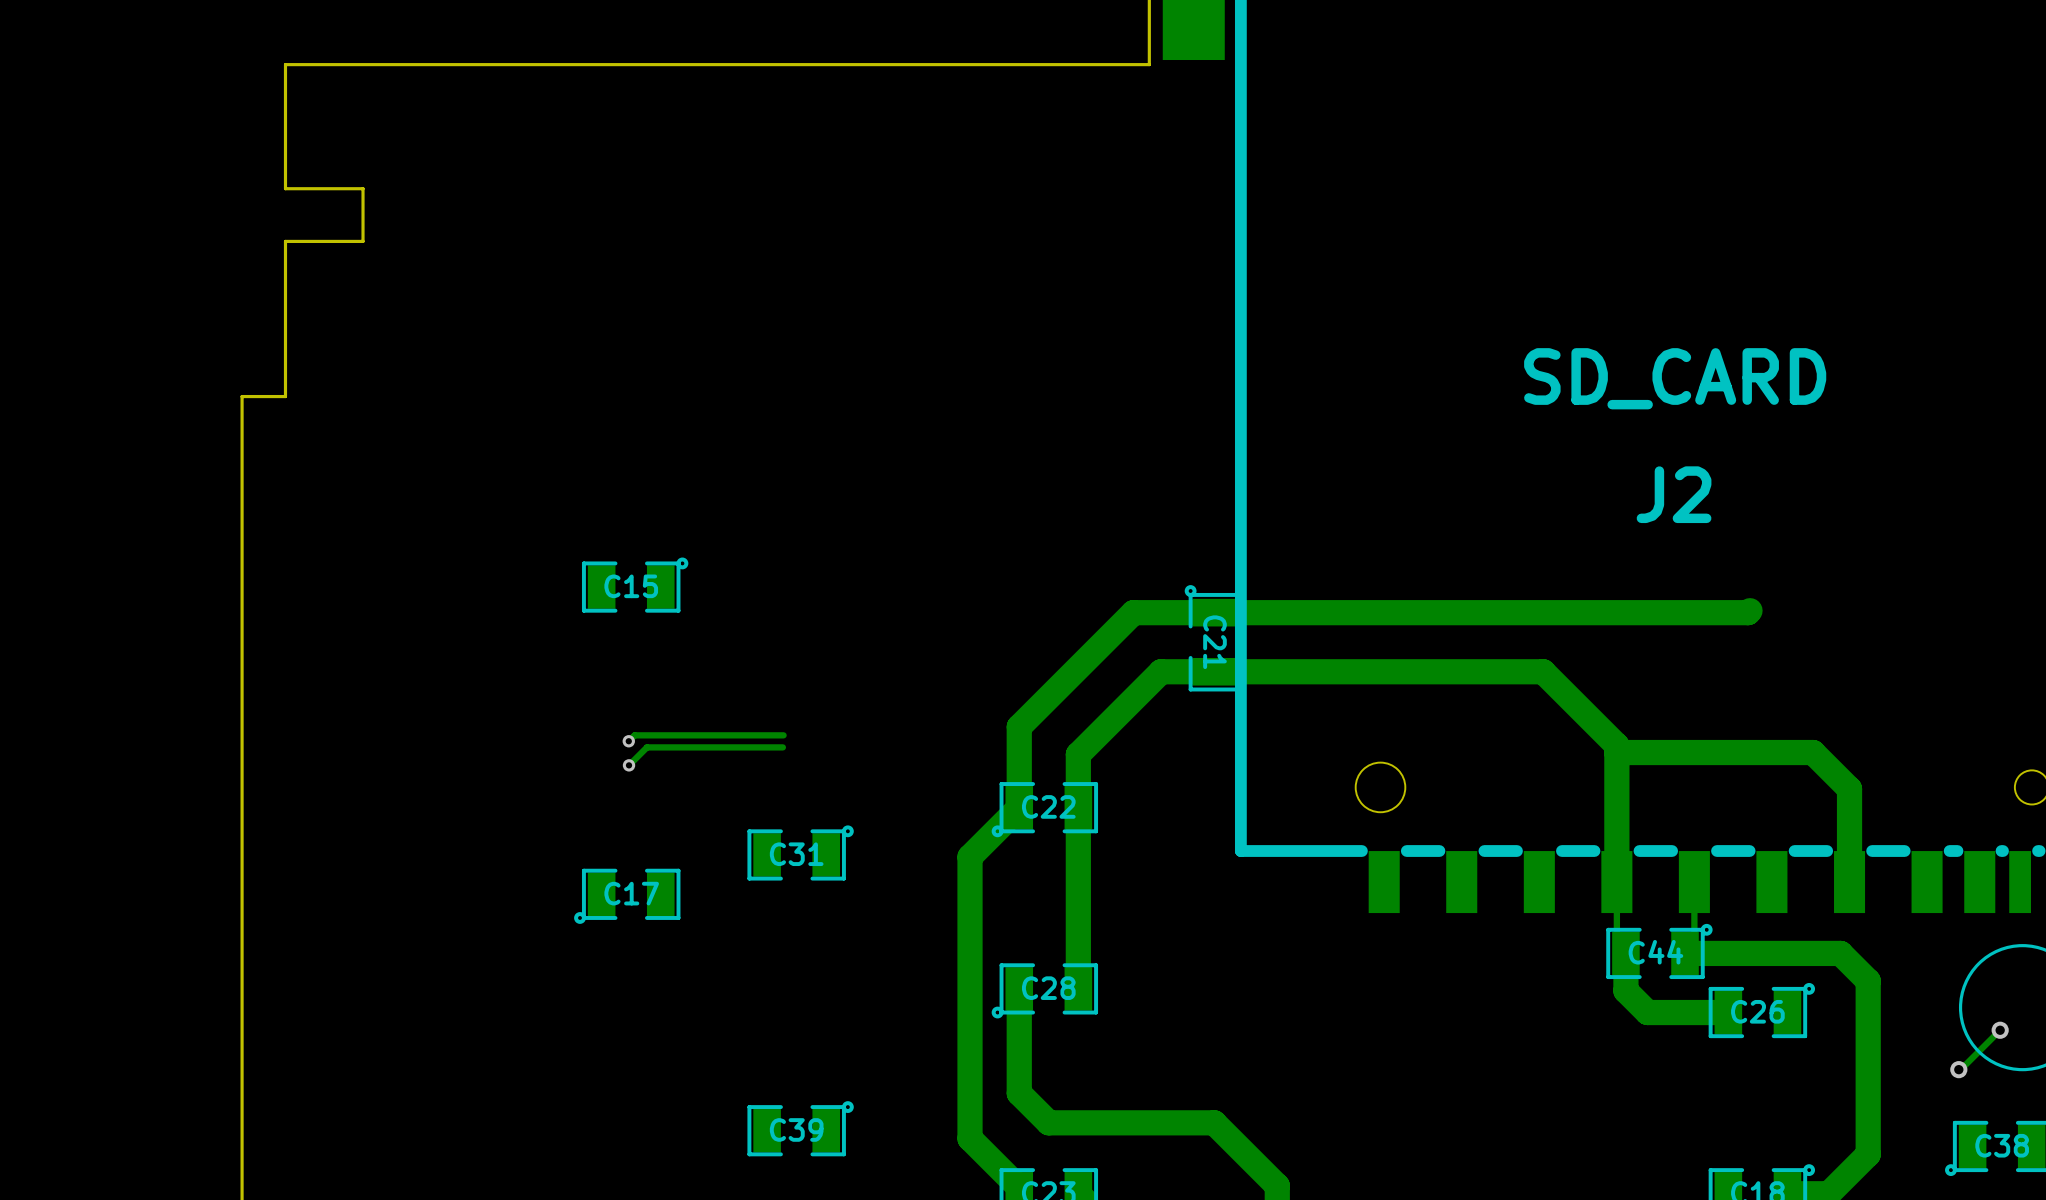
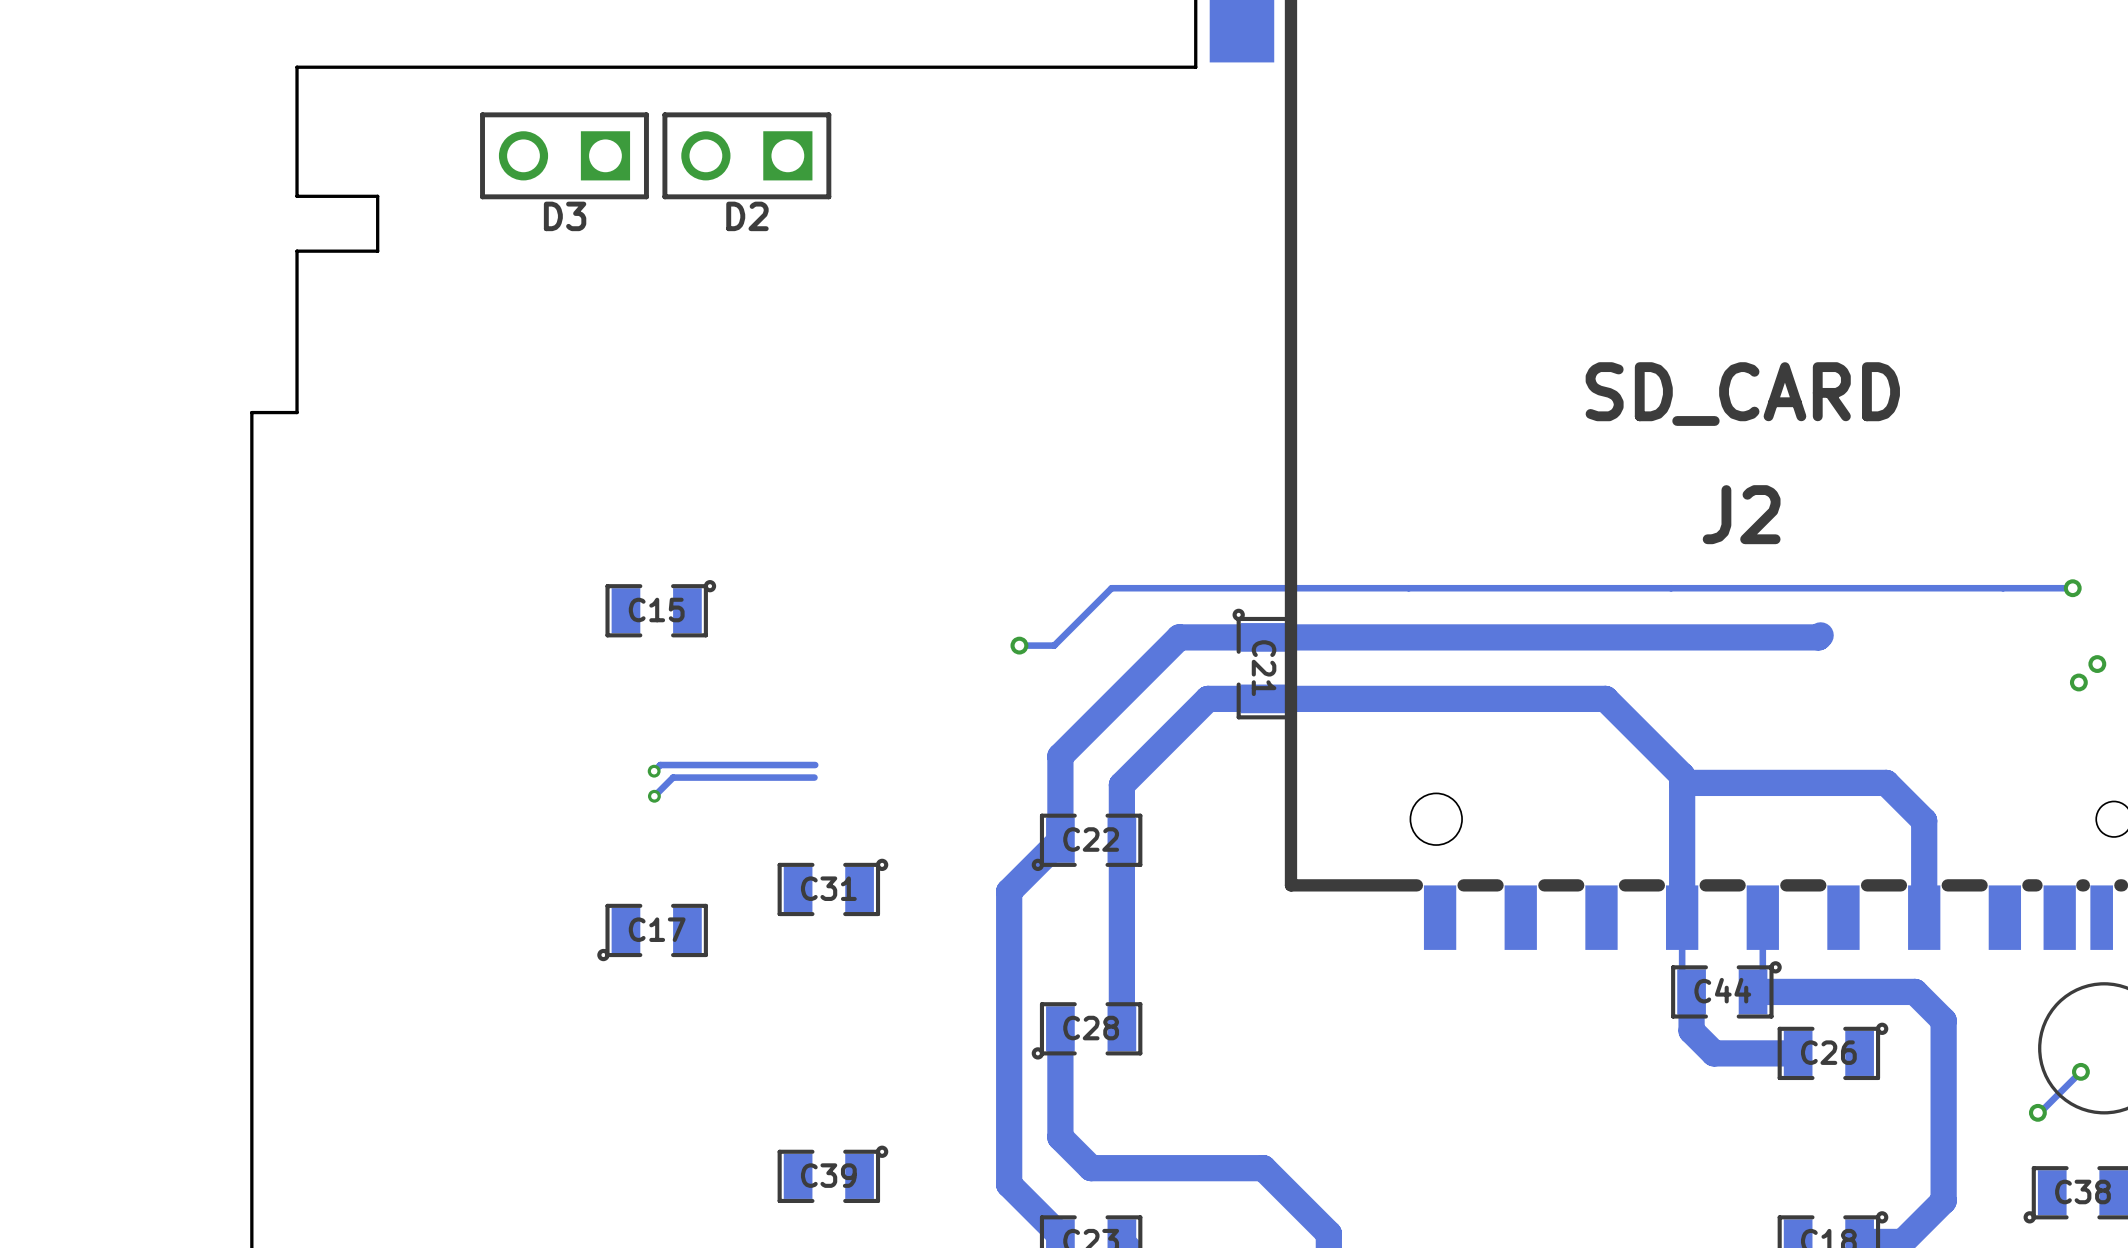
D3: none -> (564, 155)
D2: none -> (746, 155)
track: none -> (2072, 588) (1111, 588) (1054, 645) (1019, 645)
via: none -> (2072, 588)
via: none -> (1019, 645)
via: none -> (2097, 664)
via: none -> (2078, 682)

